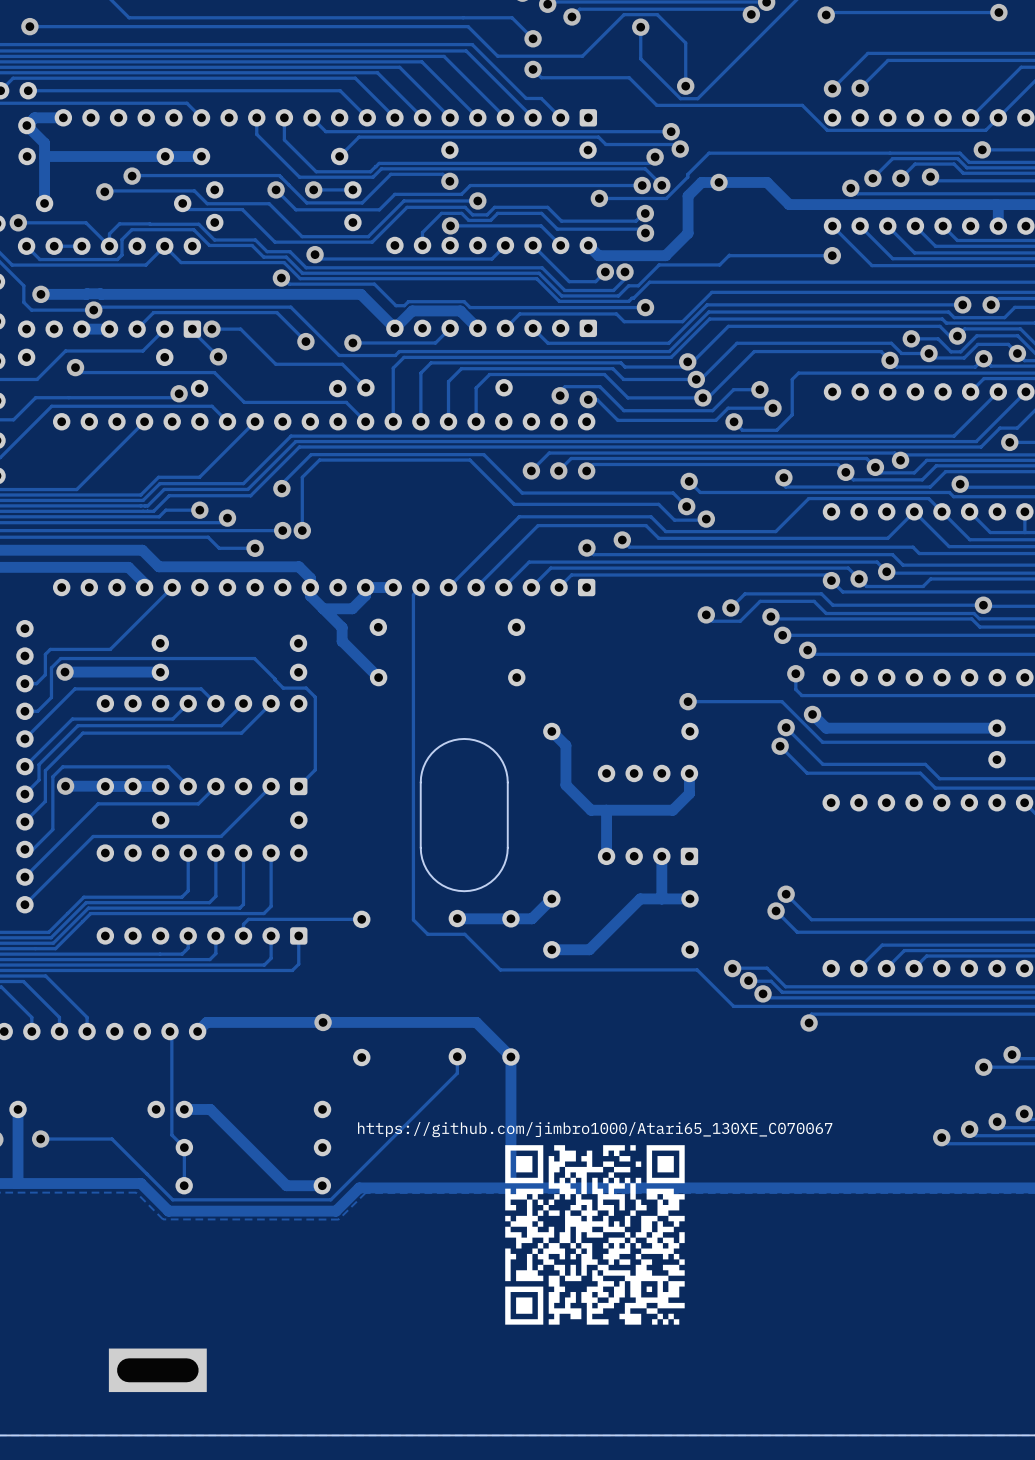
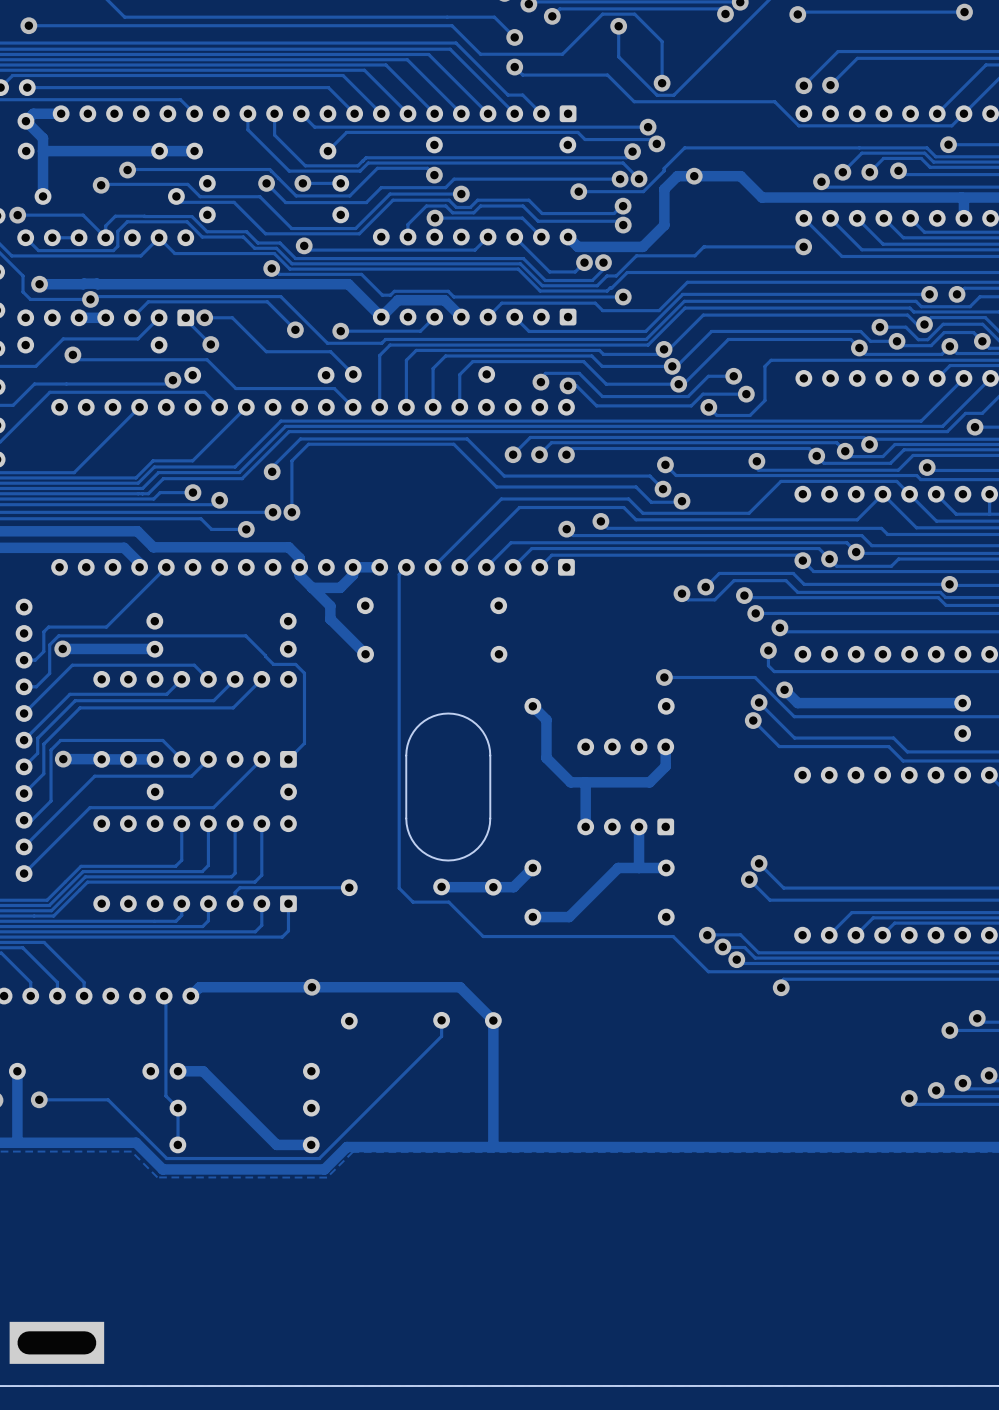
drawing: [505, 1145, 685, 1325] -> none
part position: (157, 1370) -> (56, 1342)

